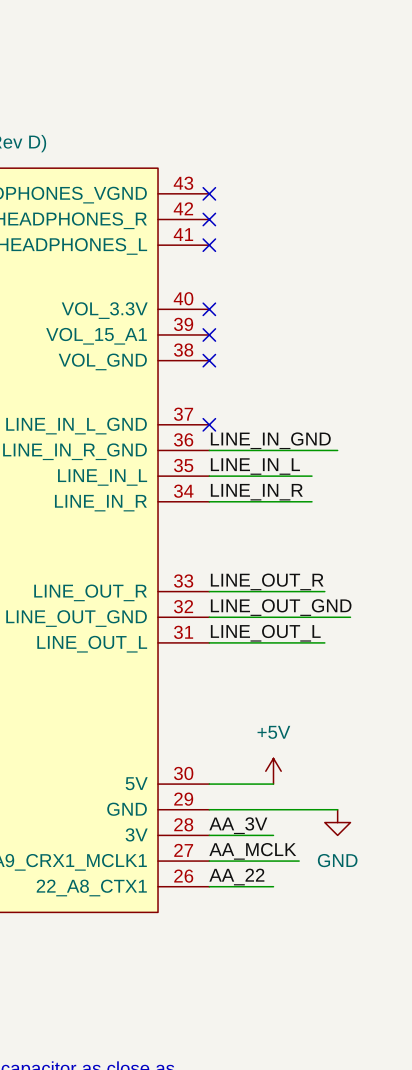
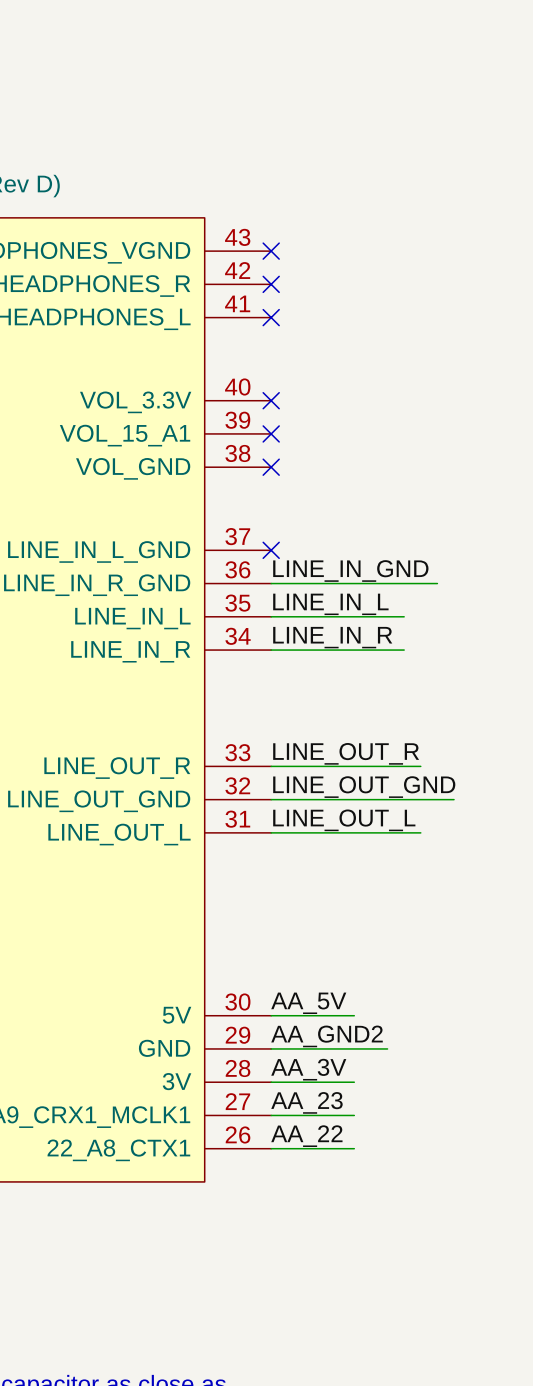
power symbol: +5V (273, 771) -> none
label: none -> AA_5V (308, 1003)
label: none -> AA_GND2 (327, 1036)
wire: (299, 809) (337, 809) -> none
power symbol: GND (337, 822) -> none
label: AA_MCLK (252, 851) -> AA_23 (306, 1102)
wire: (273, 861) (299, 861) -> none

